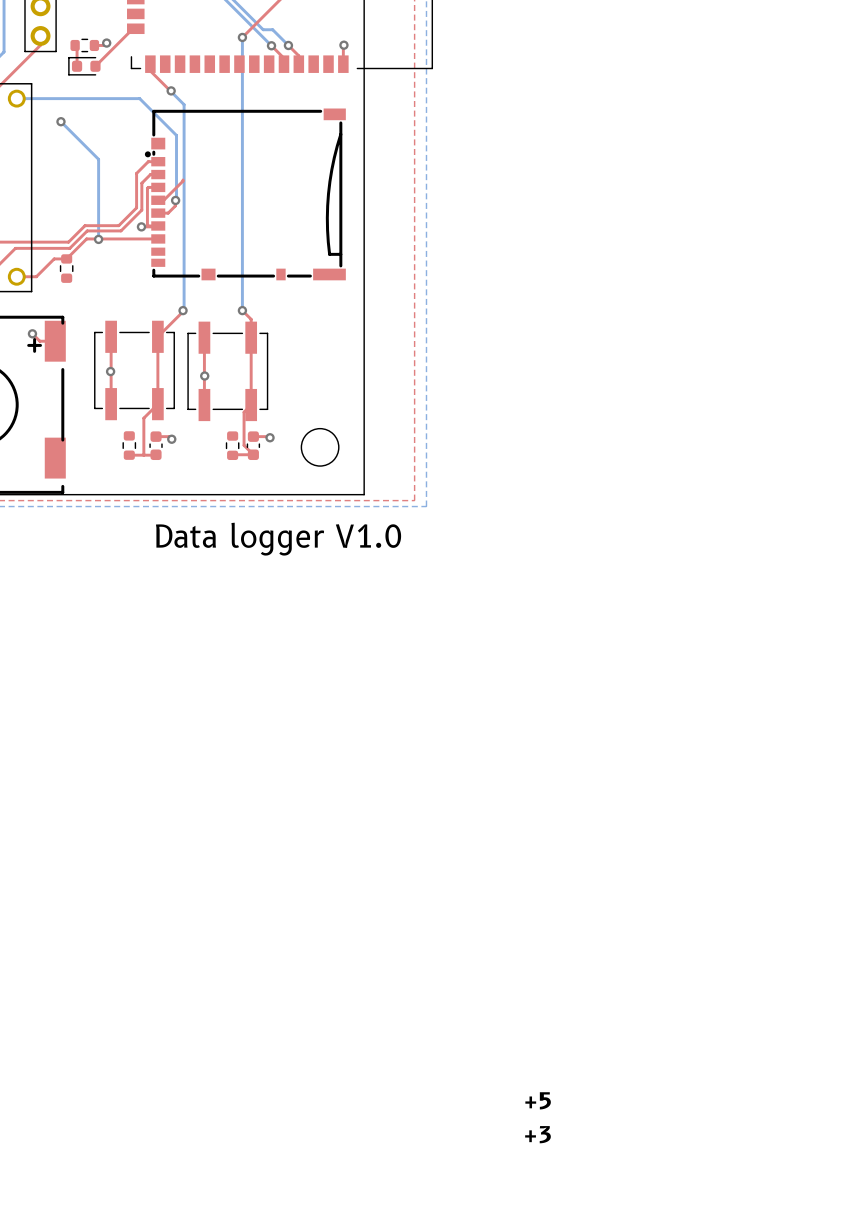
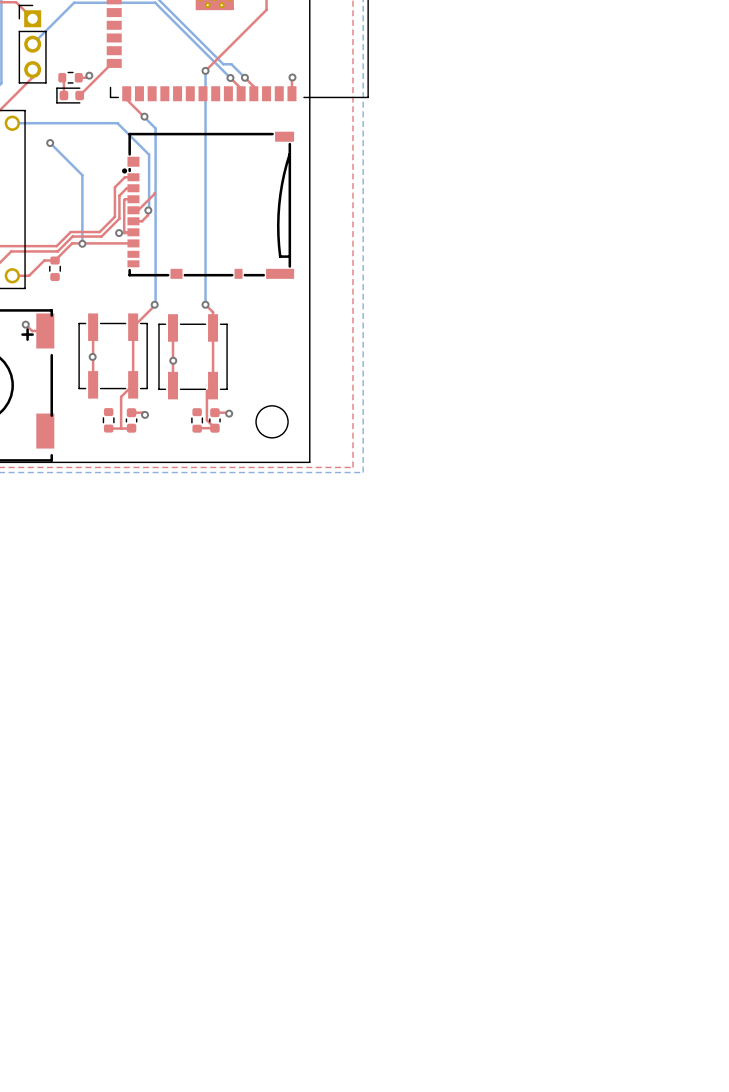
text: Data logger V1.0 (278, 539) -> none
text: +5 (538, 1100) -> none
text: +3 (537, 1134) -> none

